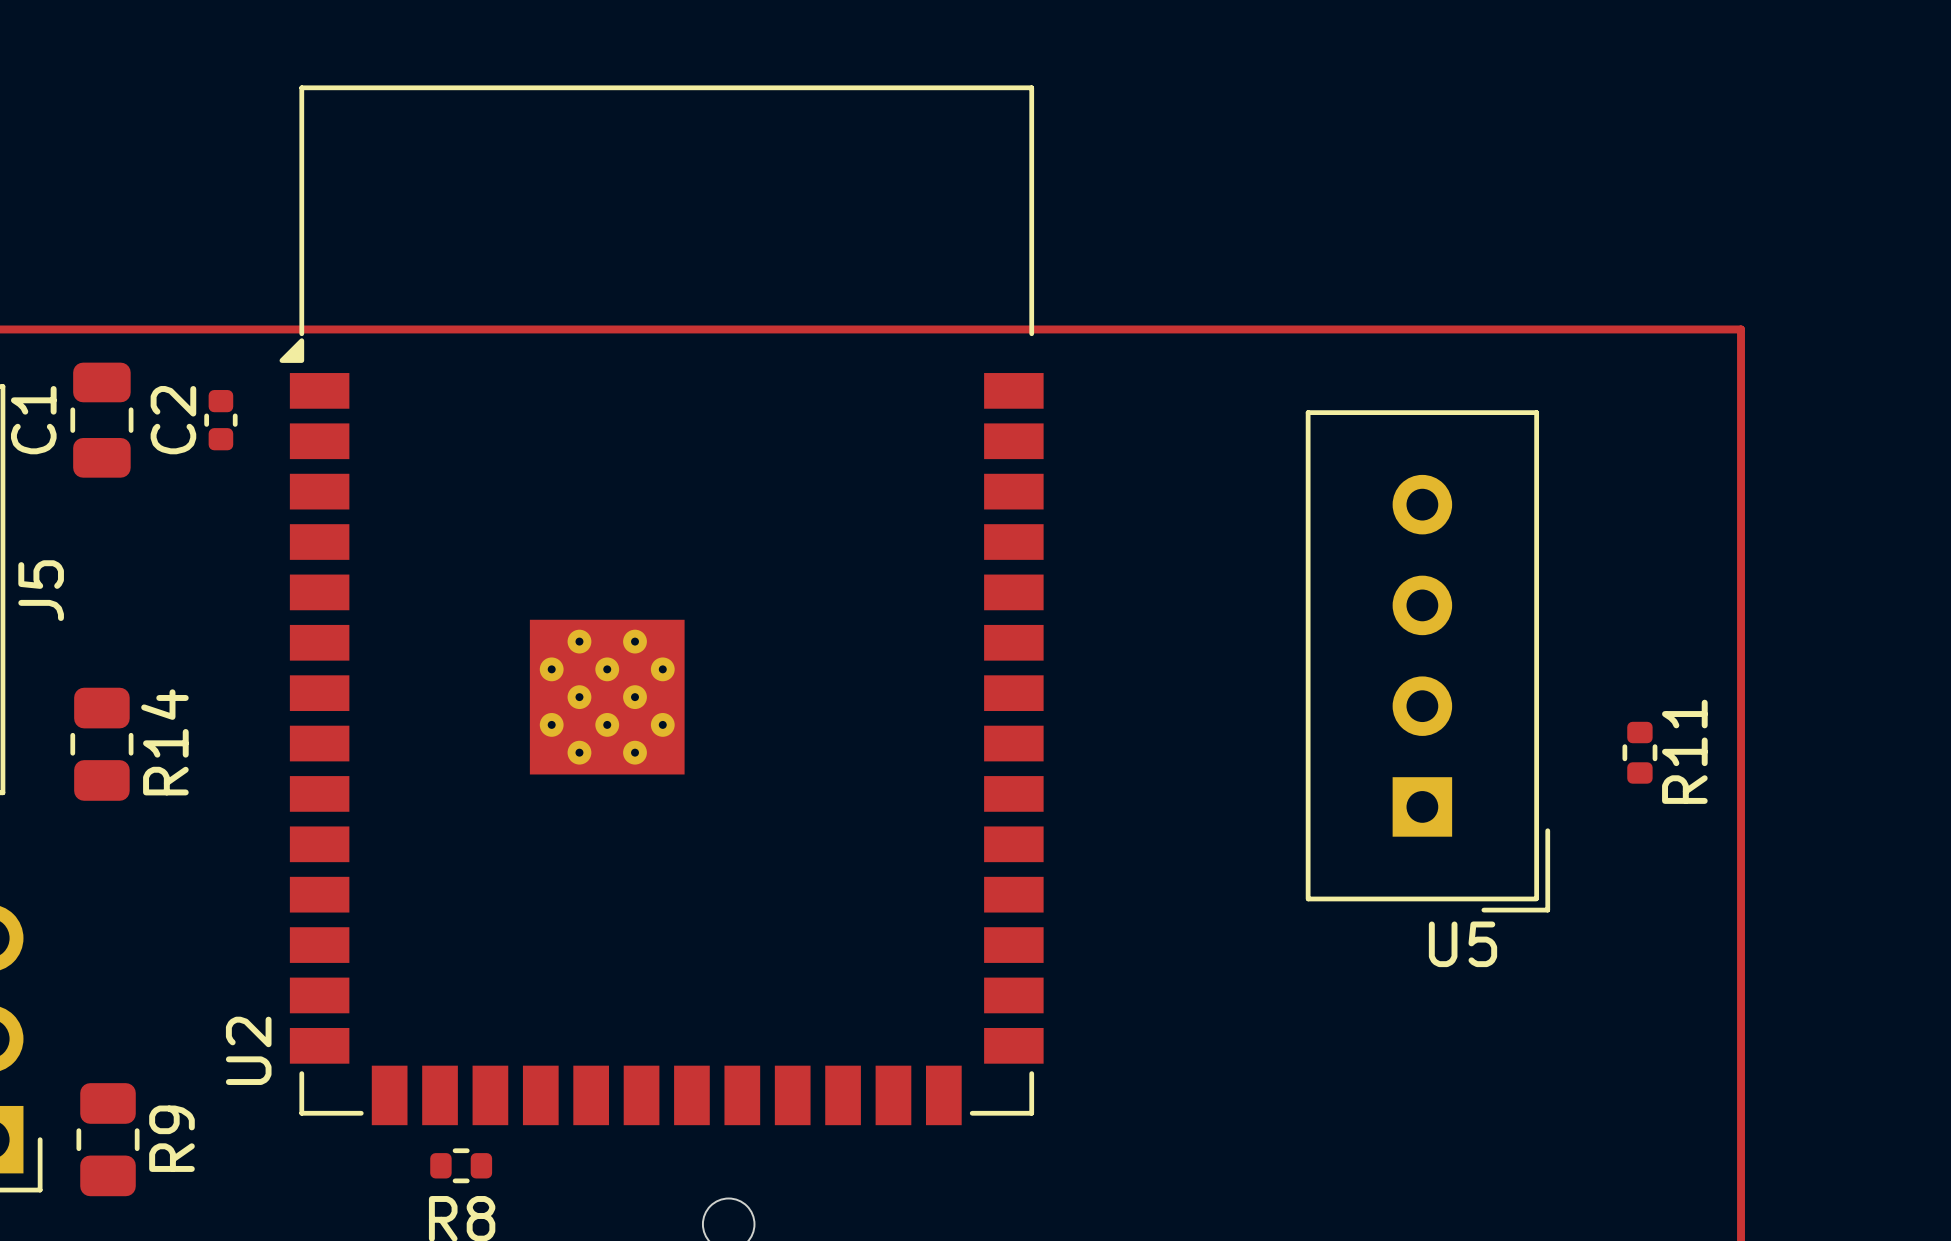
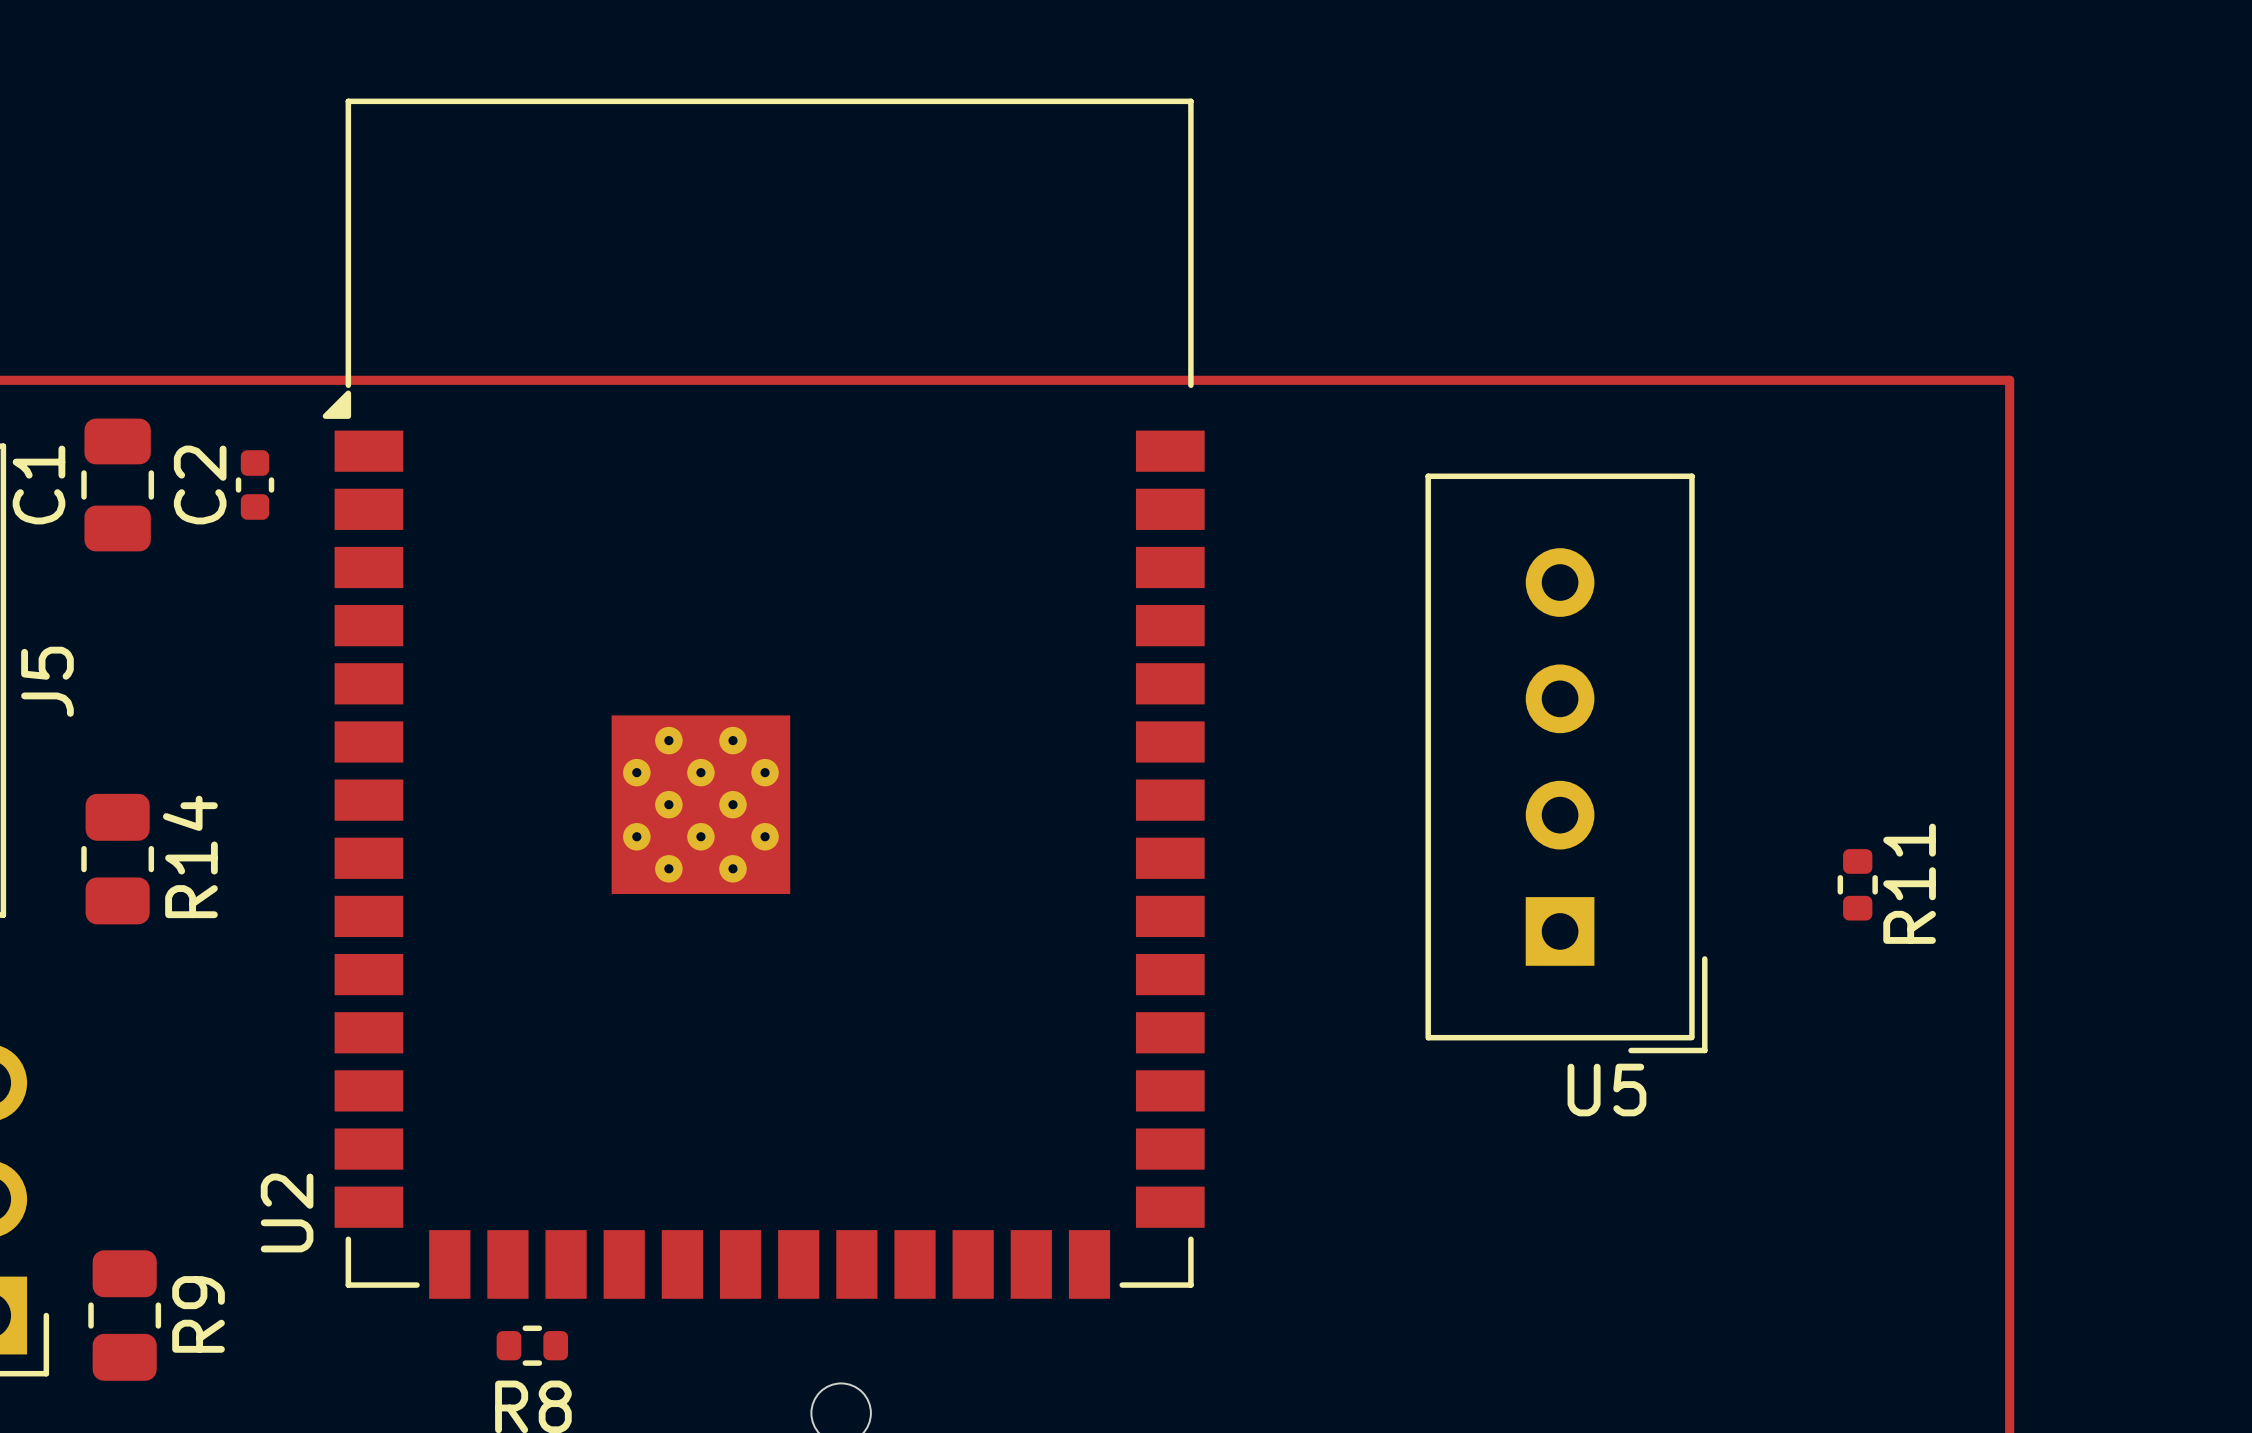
U5 position: (1427, 661) -> (1566, 763)
R11 position: (1639, 752) -> (1857, 884)

